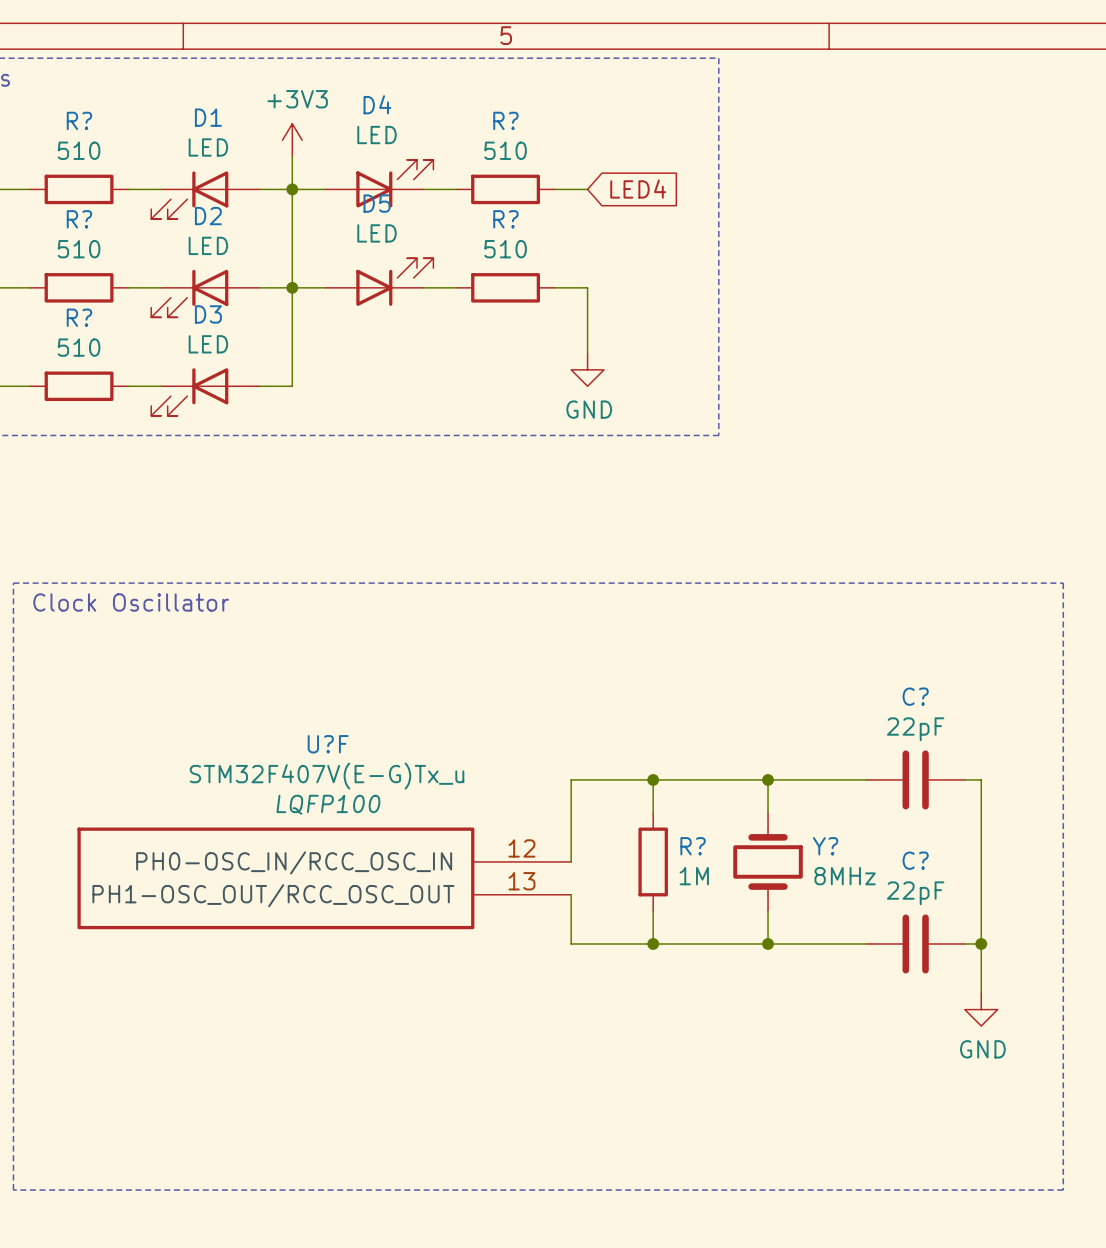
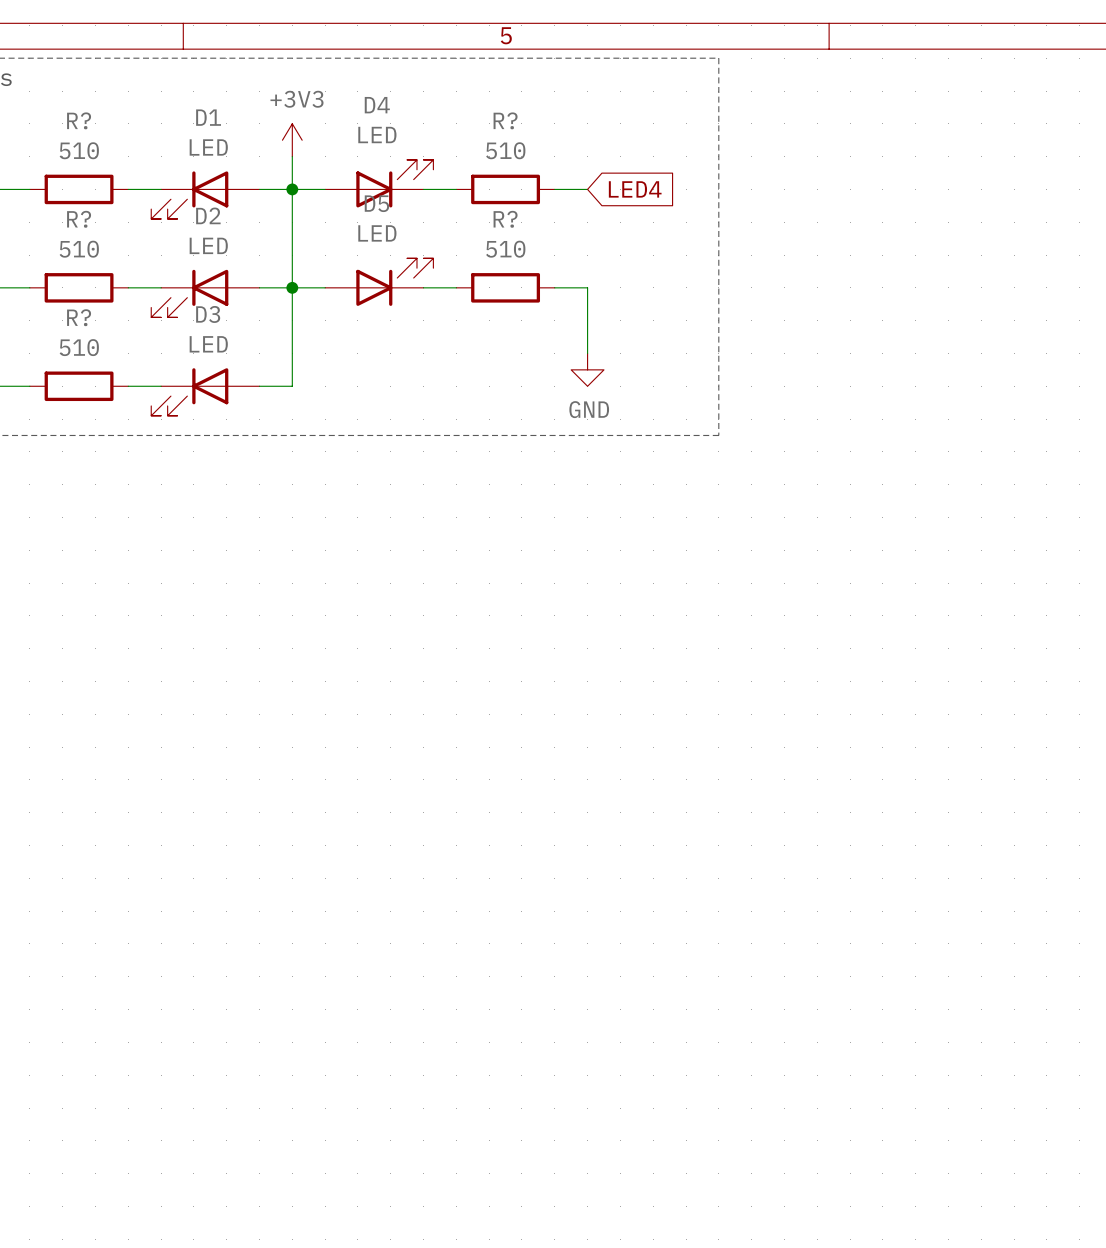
line: (13, 583) (1063, 583) (1063, 1190) (13, 1190) (13, 583) -> none
text: Clock Oscillator (131, 602) -> none
wire: (653, 779) (653, 812) -> none
junction: (653, 779) -> none
wire: (768, 779) (768, 812) -> none
junction: (768, 779) -> none
wire: (866, 779) (571, 779) (571, 861) -> none
C?: 22pF (915, 779) -> none
wire: (964, 779) (981, 779) (981, 993) -> none
R?: 1M (653, 861) -> none
Y?: 8MHz (768, 861) -> none
U?F: STM32F407V(E-G)Tx_u (324, 878) -> none
wire: (571, 894) (571, 943) (866, 943) -> none
wire: (653, 911) (653, 943) -> none
wire: (768, 911) (768, 943) -> none
junction: (653, 943) -> none
junction: (768, 943) -> none
C?: 22pF (915, 943) -> none
wire: (964, 943) (981, 943) -> none
junction: (981, 943) -> none
power symbol: GND (981, 1009) -> none

